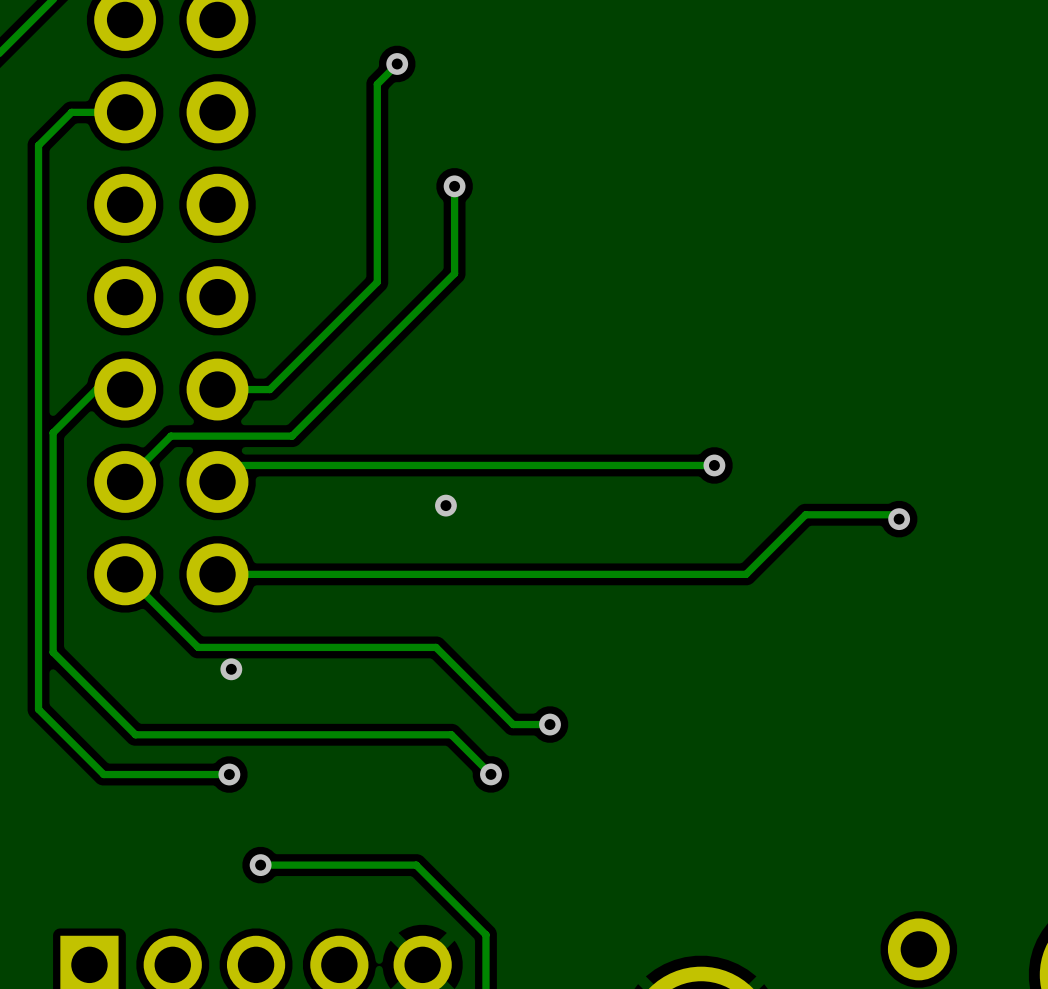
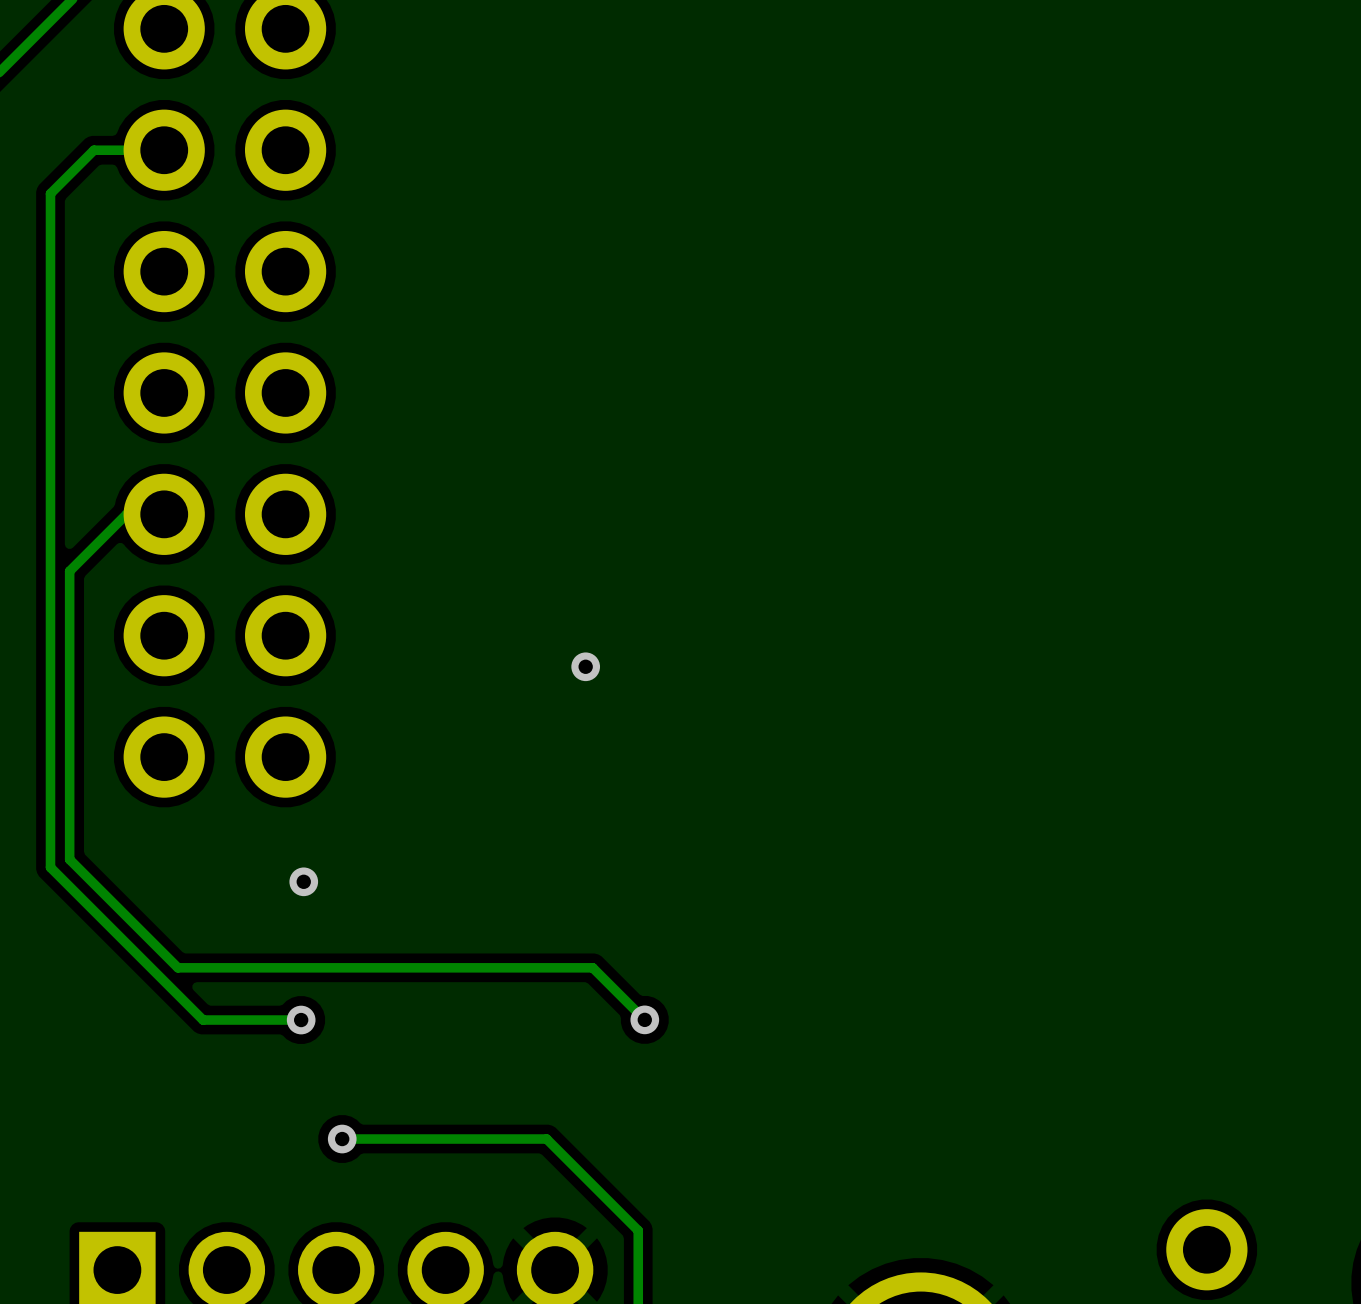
via: (397, 63) -> none
track: (397, 64) (377, 84) (377, 282) (269, 389) (217, 389) -> none
track: (454, 186) (454, 273) (292, 436) (170, 436) (125, 481) -> none
via: (454, 186) -> none
track: (714, 465) (233, 465) -> none
via: (714, 465) -> none
track: (899, 519) (894, 514) (805, 514) (746, 574) (217, 574) -> none
via: (899, 519) -> none
track: (125, 574) (198, 647) (436, 647) (513, 724) (549, 724) -> none
track: (38, 658) (38, 709) (103, 774) (154, 774) -> (50, 867) (203, 1020)
via: (549, 724) -> none

